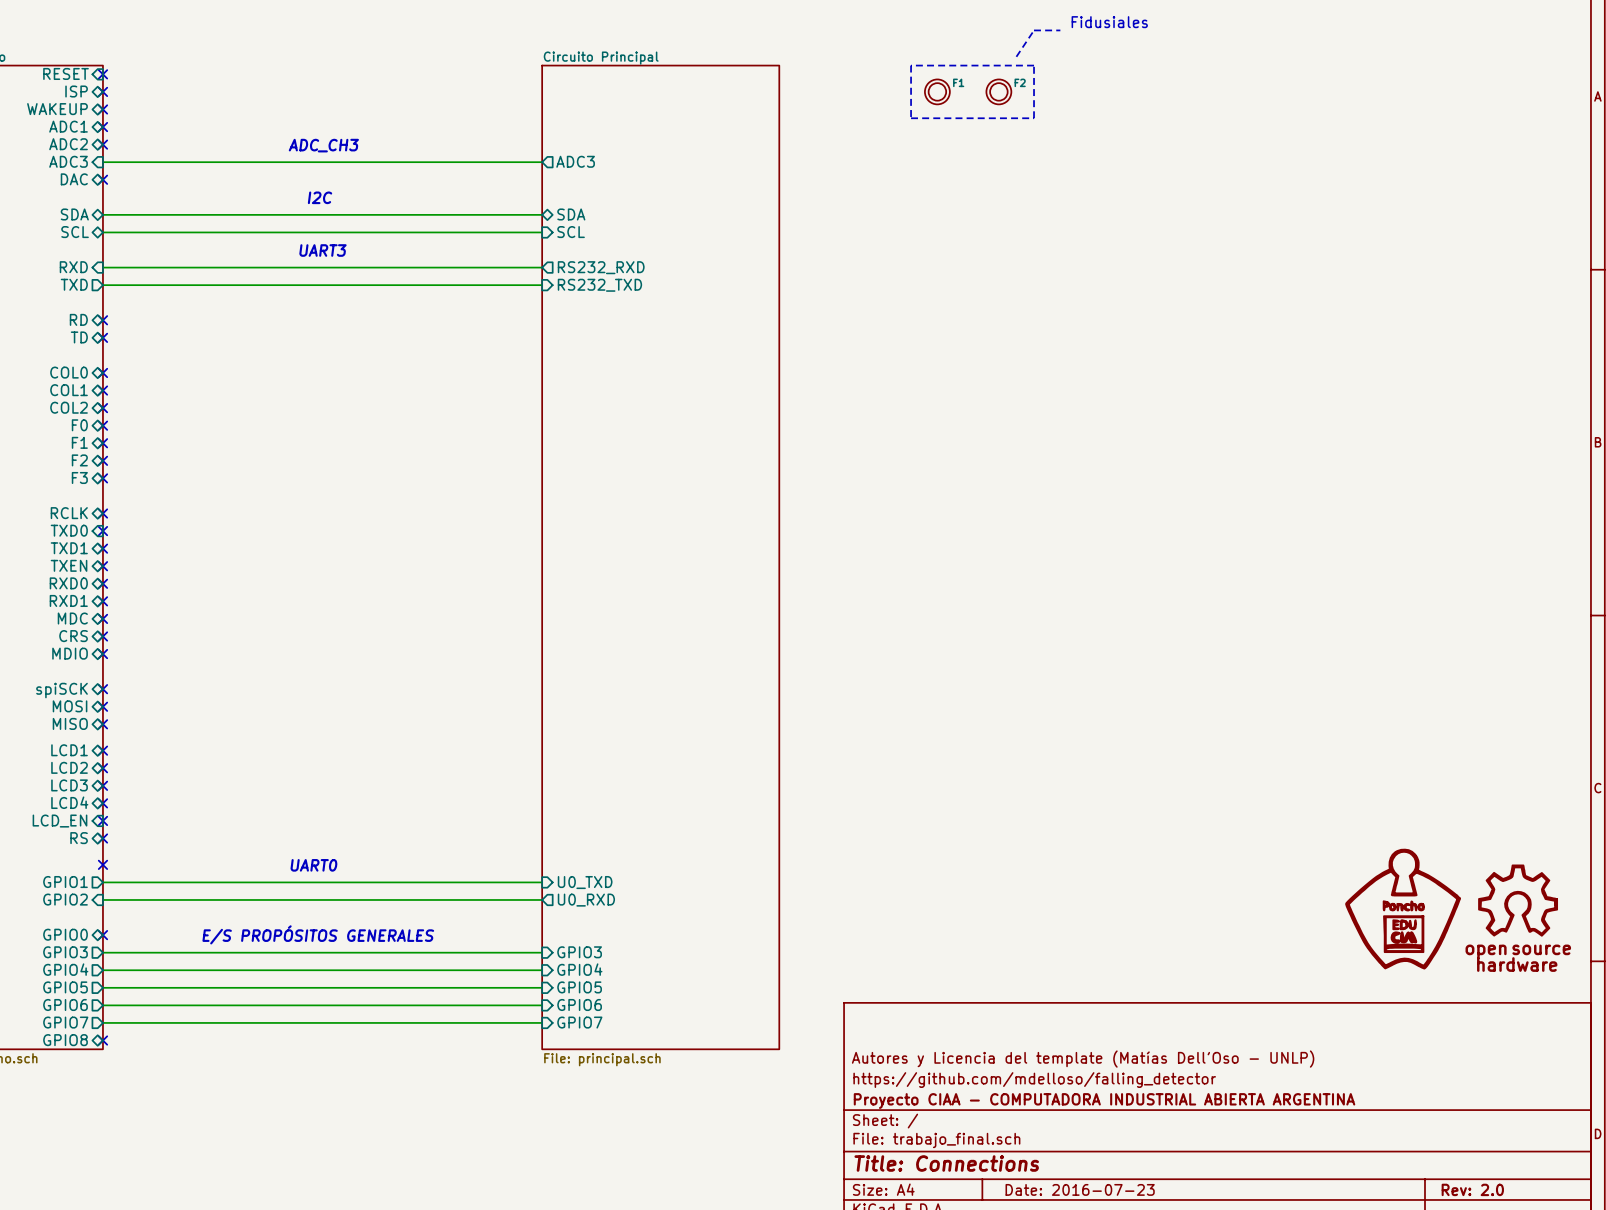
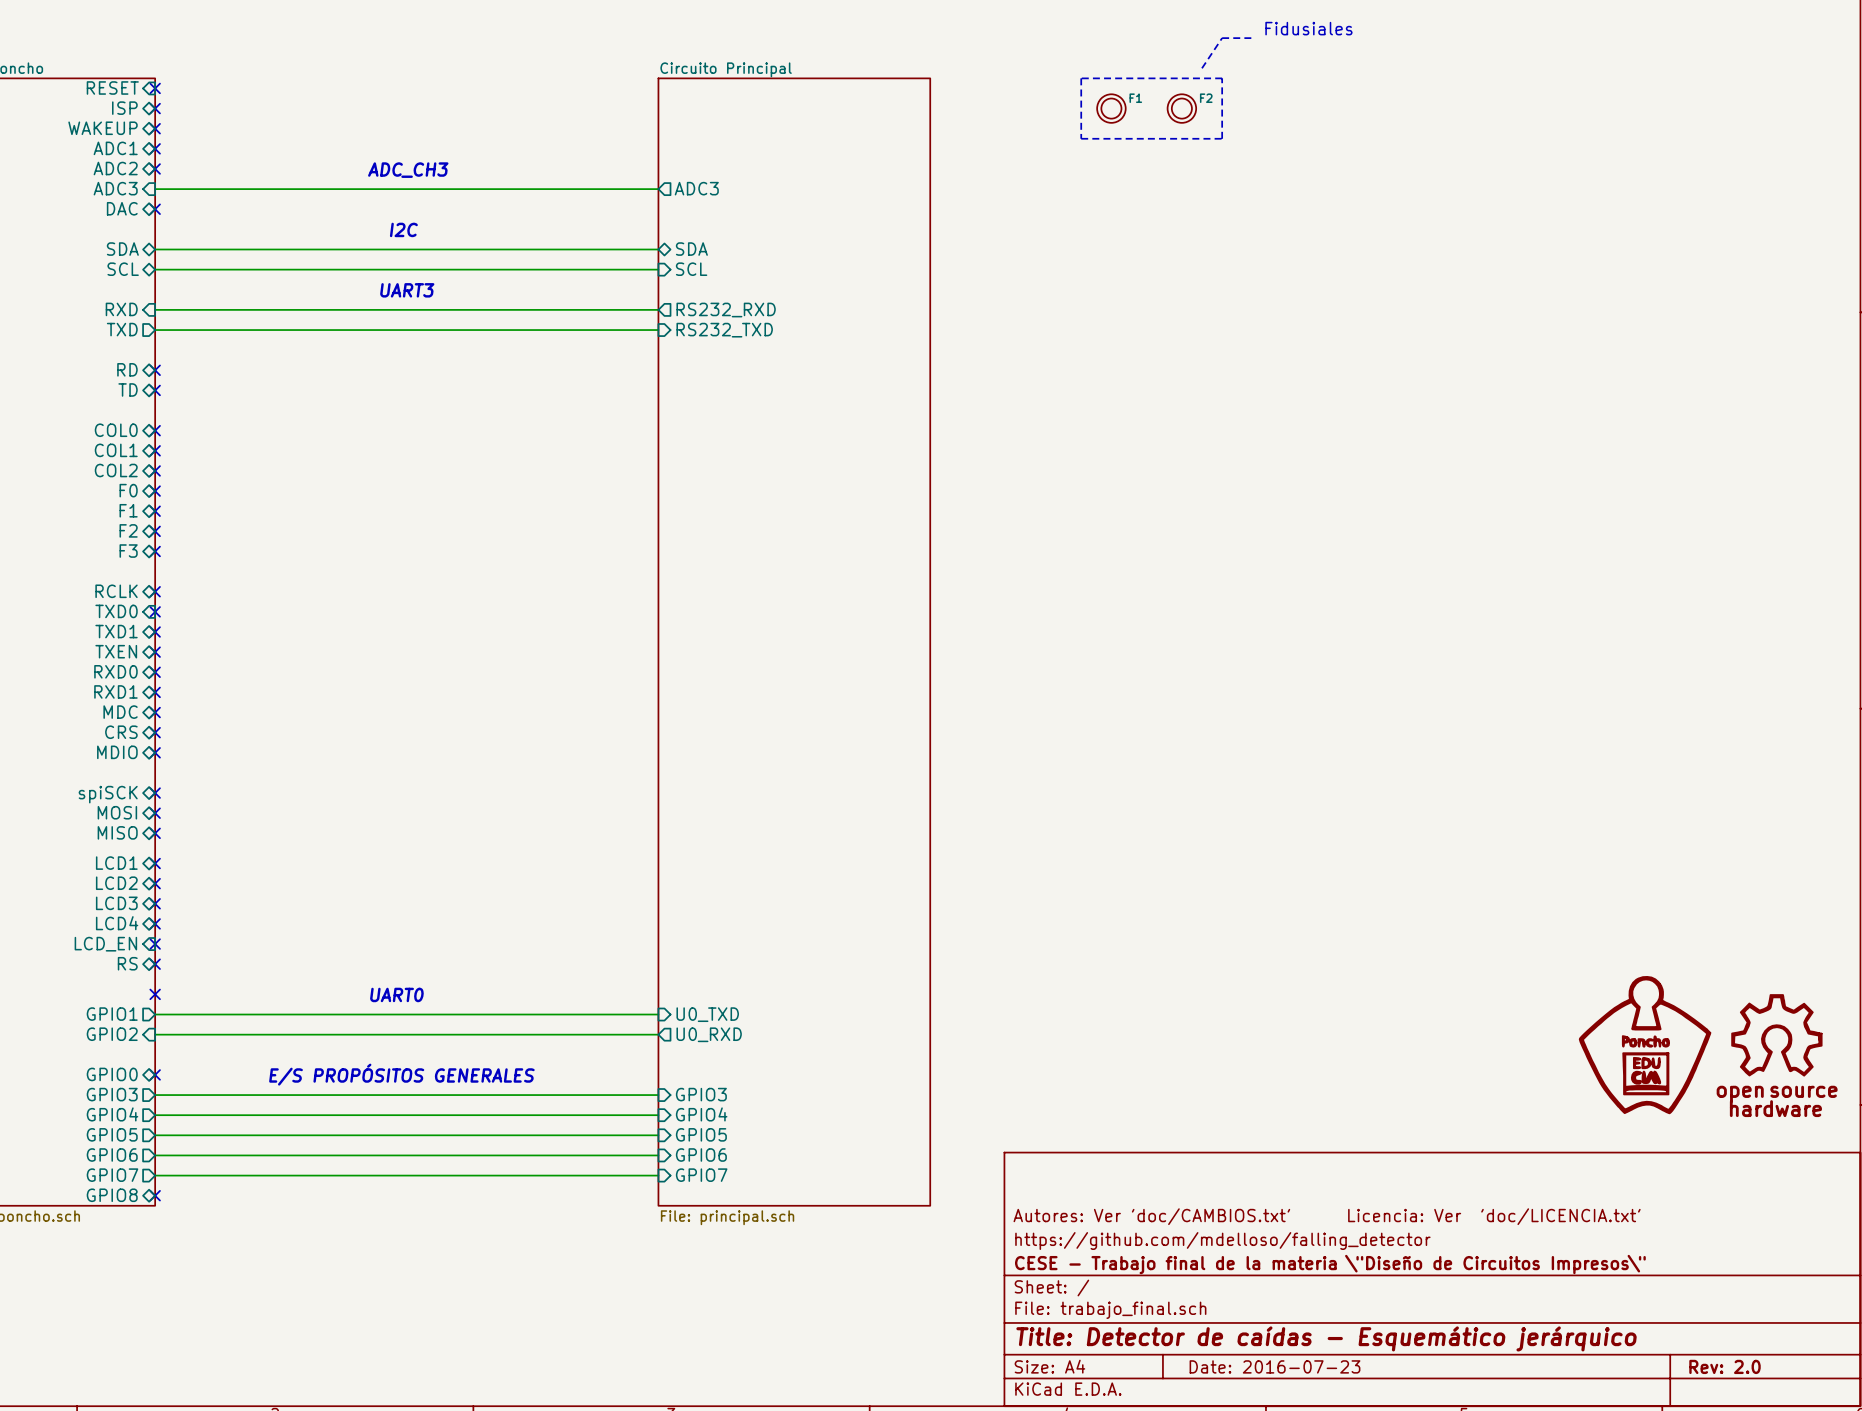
title block: Autores y Licencia del template (Matías Dell'Oso - UNLP) (1083, 1059) -> Autores: Ver 'doc/CAMBIOS.txt' Licencia: Ver 'doc/LICENCIA.txt' (1327, 1216)
title block: Proyecto CIAA - COMPUTADORA INDUSTRIAL ABIERTA ARGENTINA (1104, 1101) -> CESE - Trabajo final de la materia \"Diseño de Circuitos Impresos\" (1330, 1264)
title block: Title: Connections (946, 1163) -> Title: Detector de caídas - Esquemático jerárquico (1326, 1338)

